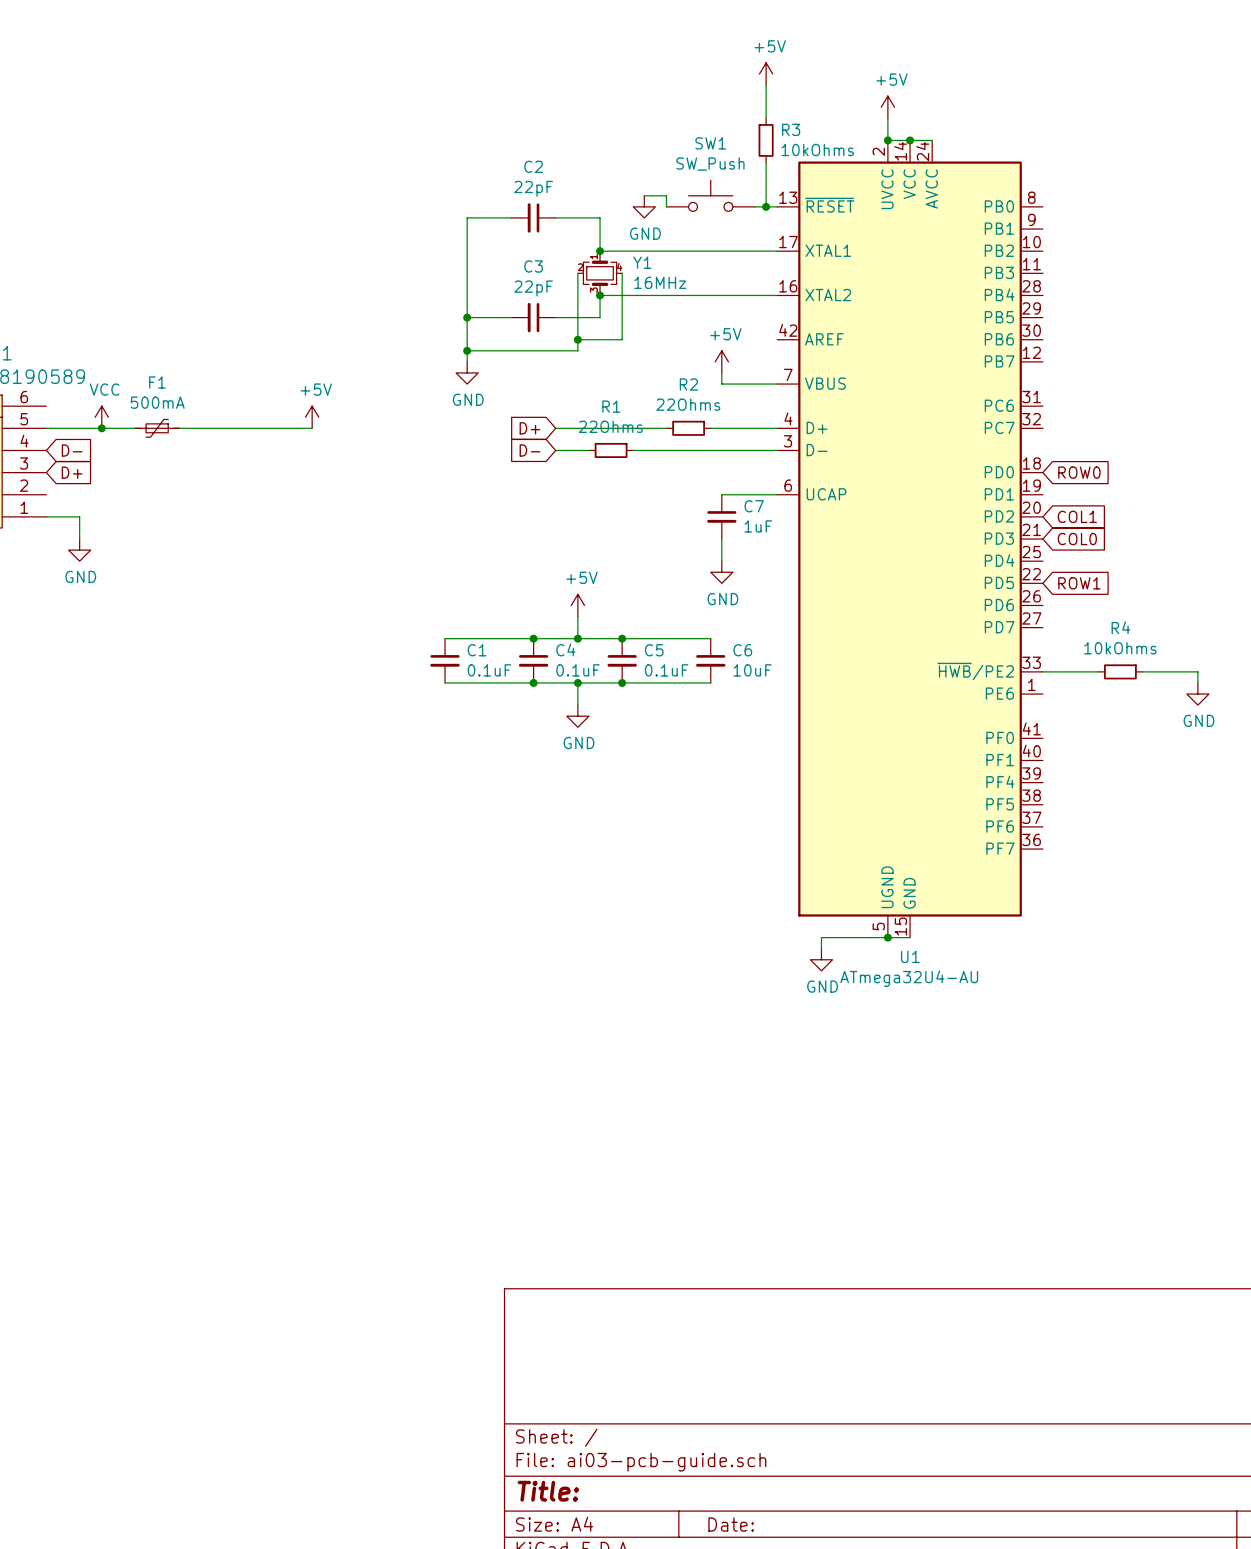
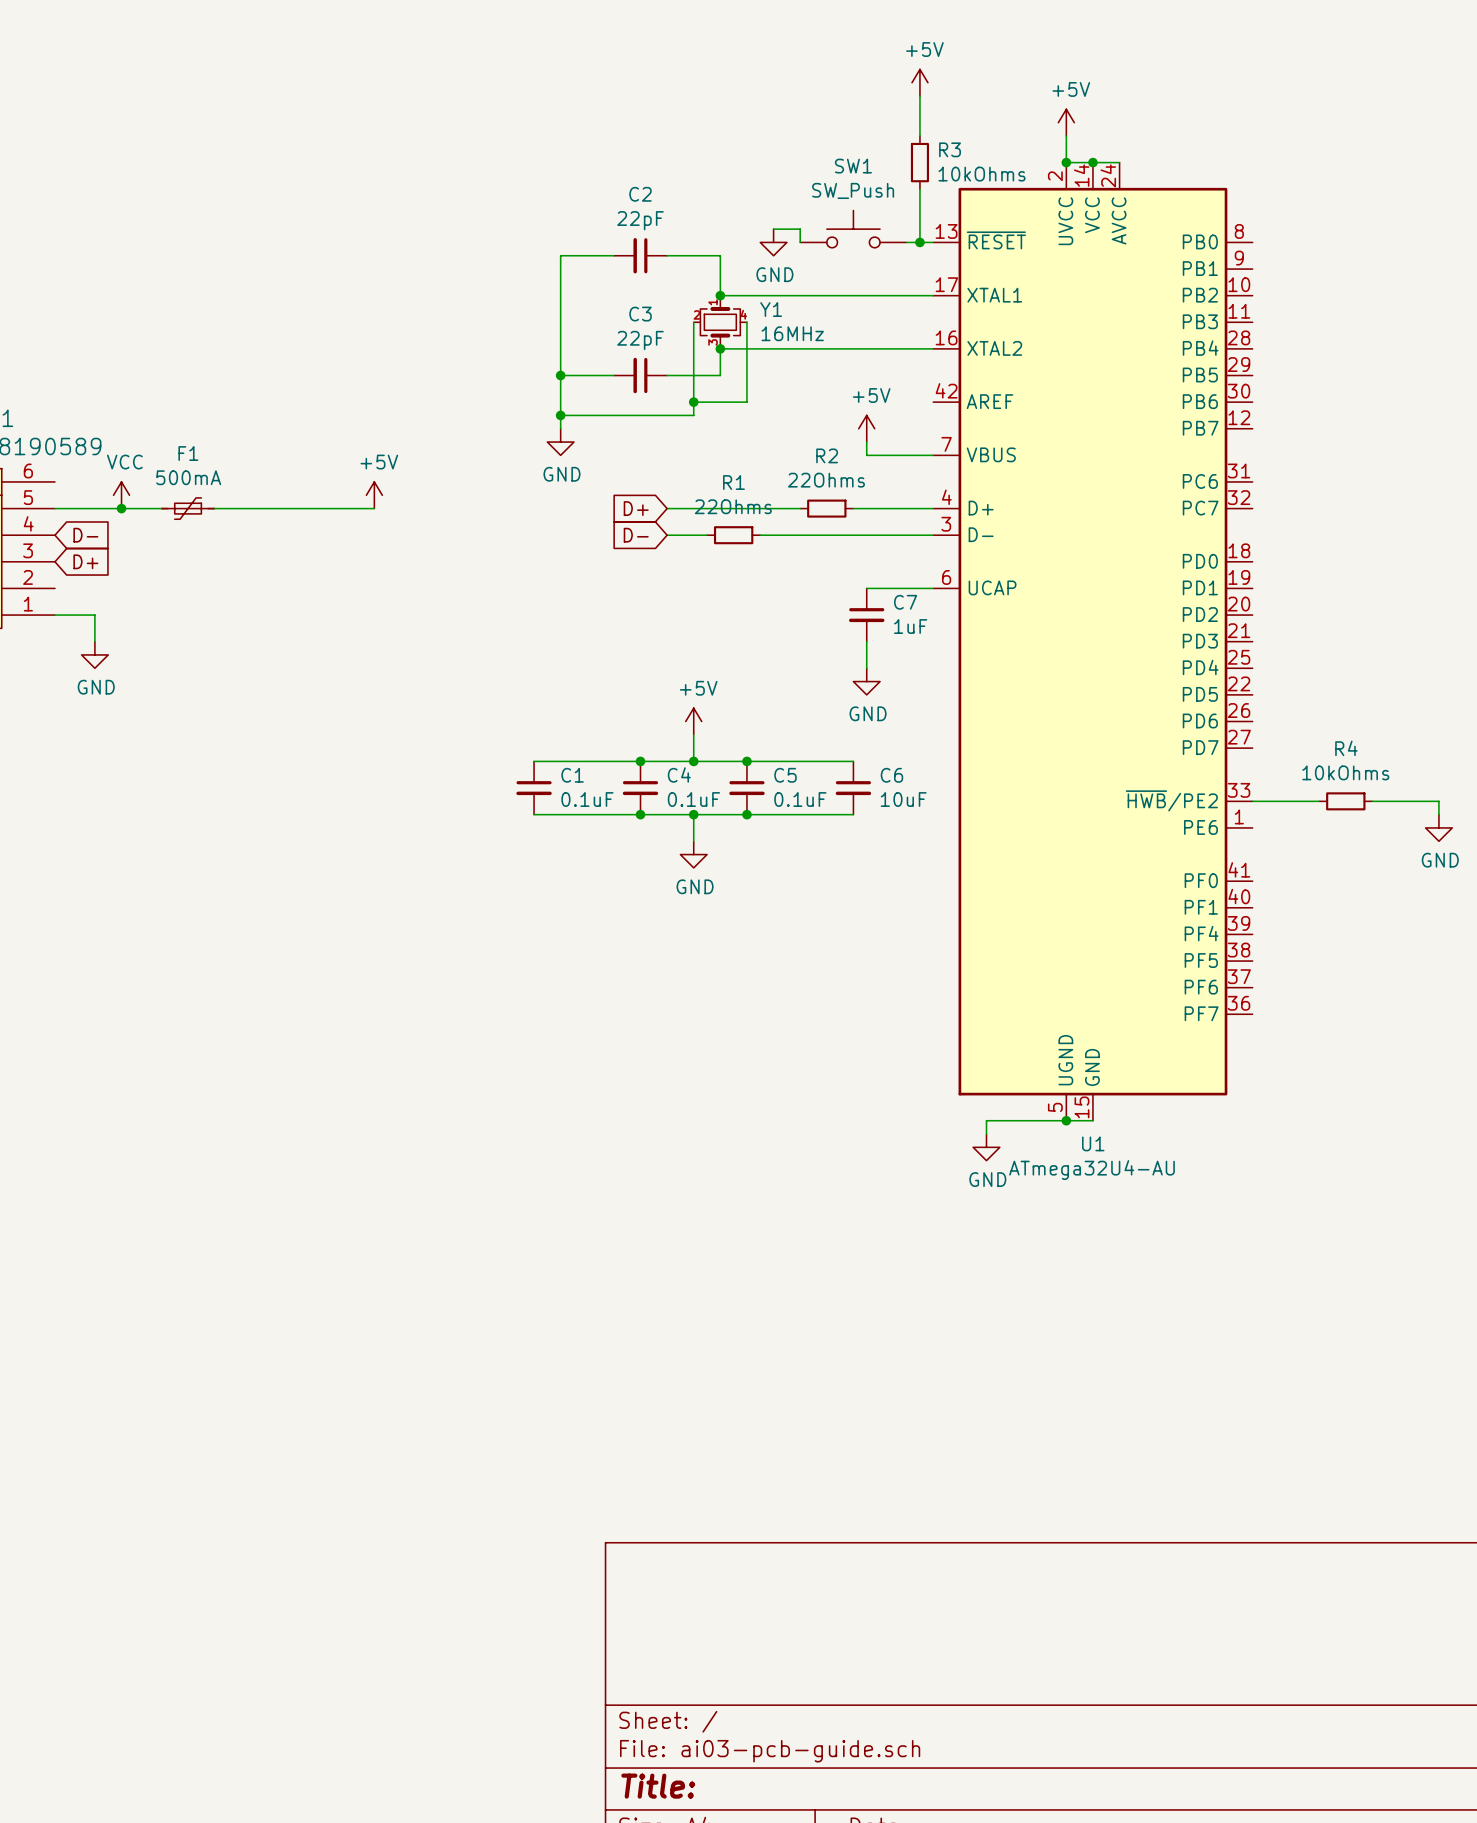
global label: ROW0 (1079, 472) -> none
global label: COL1 (1077, 516) -> none
global label: COL0 (1077, 539) -> none
global label: ROW1 (1079, 583) -> none

